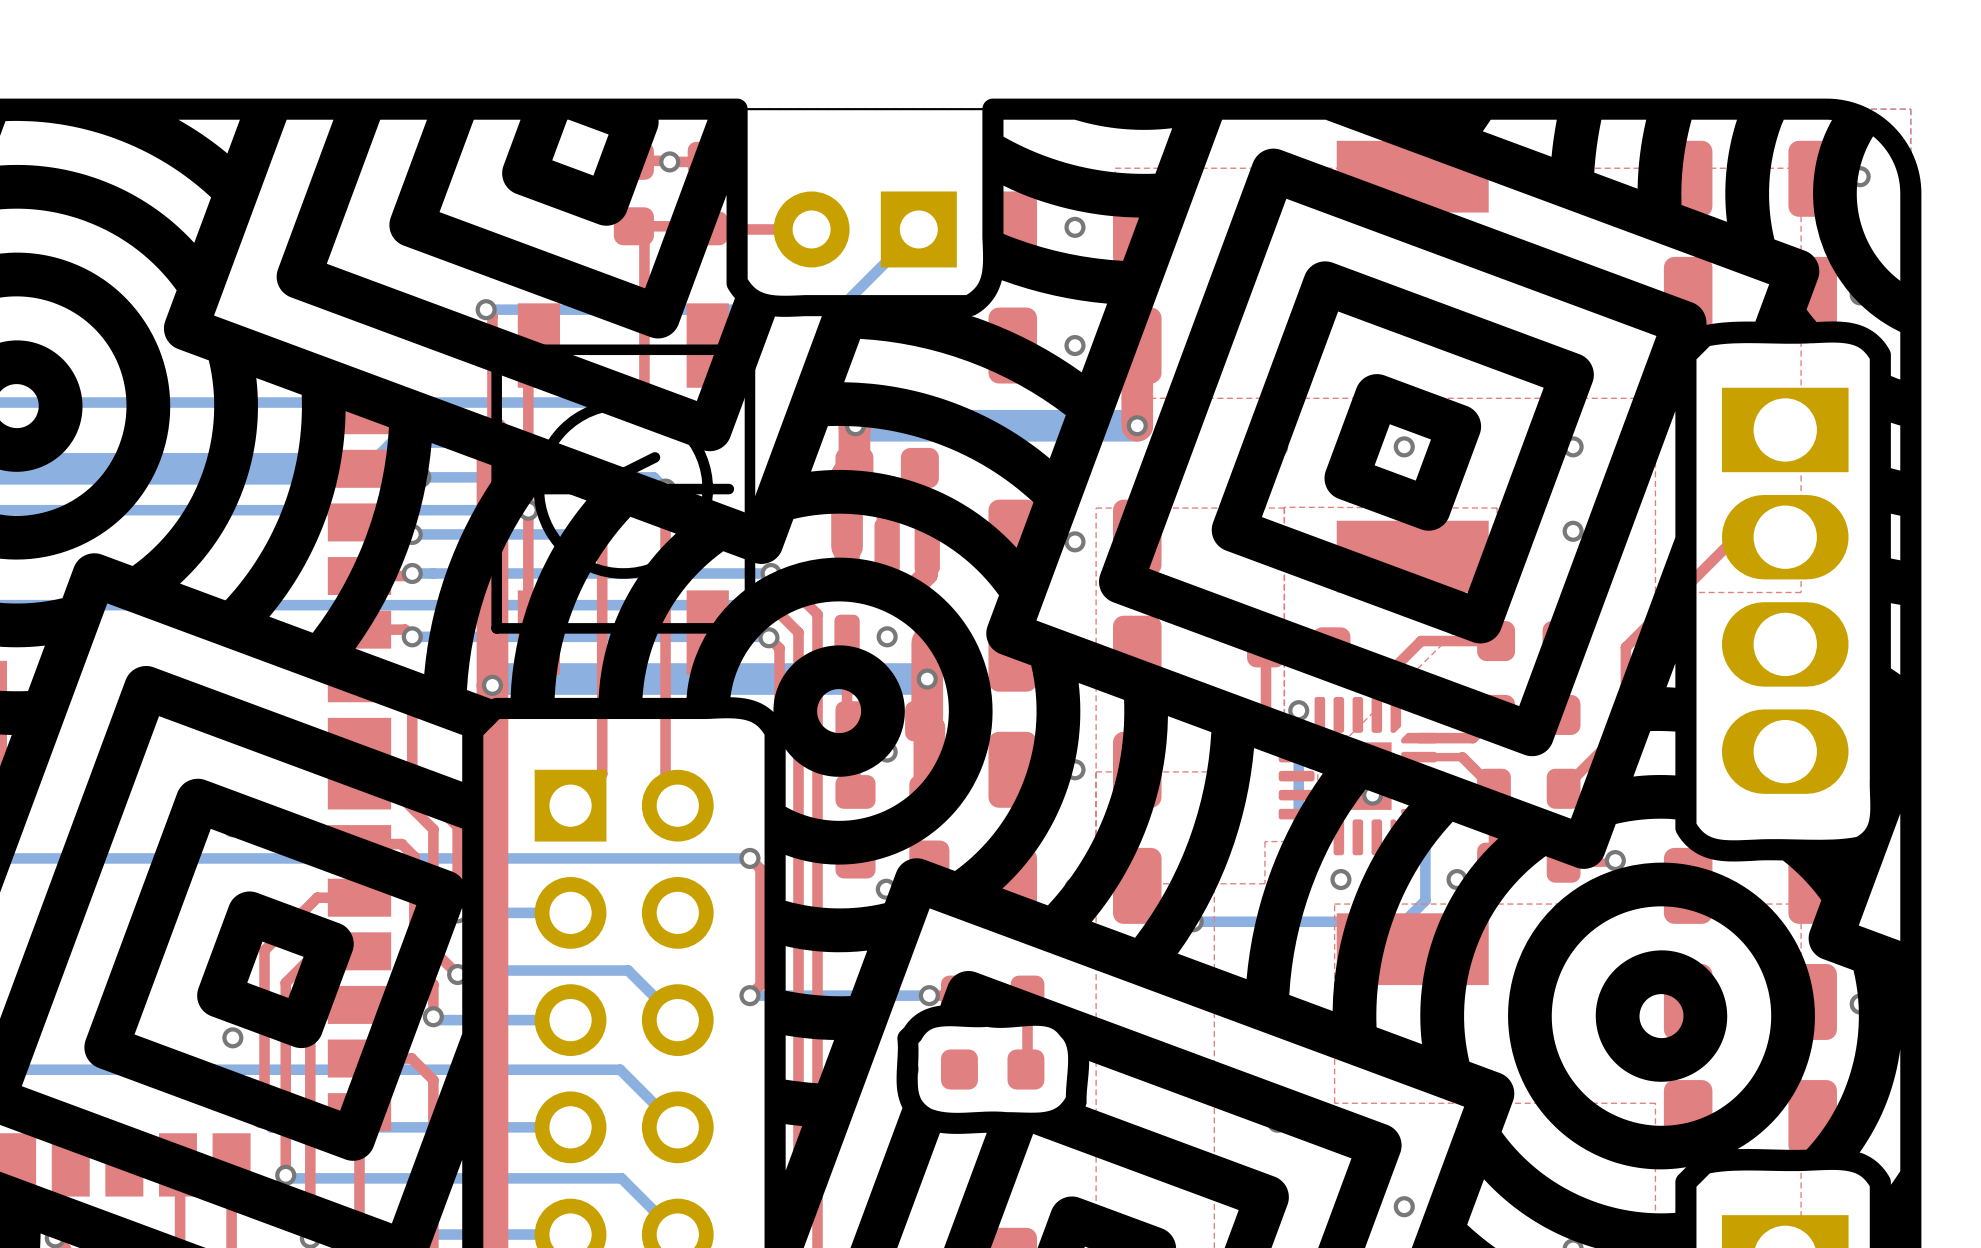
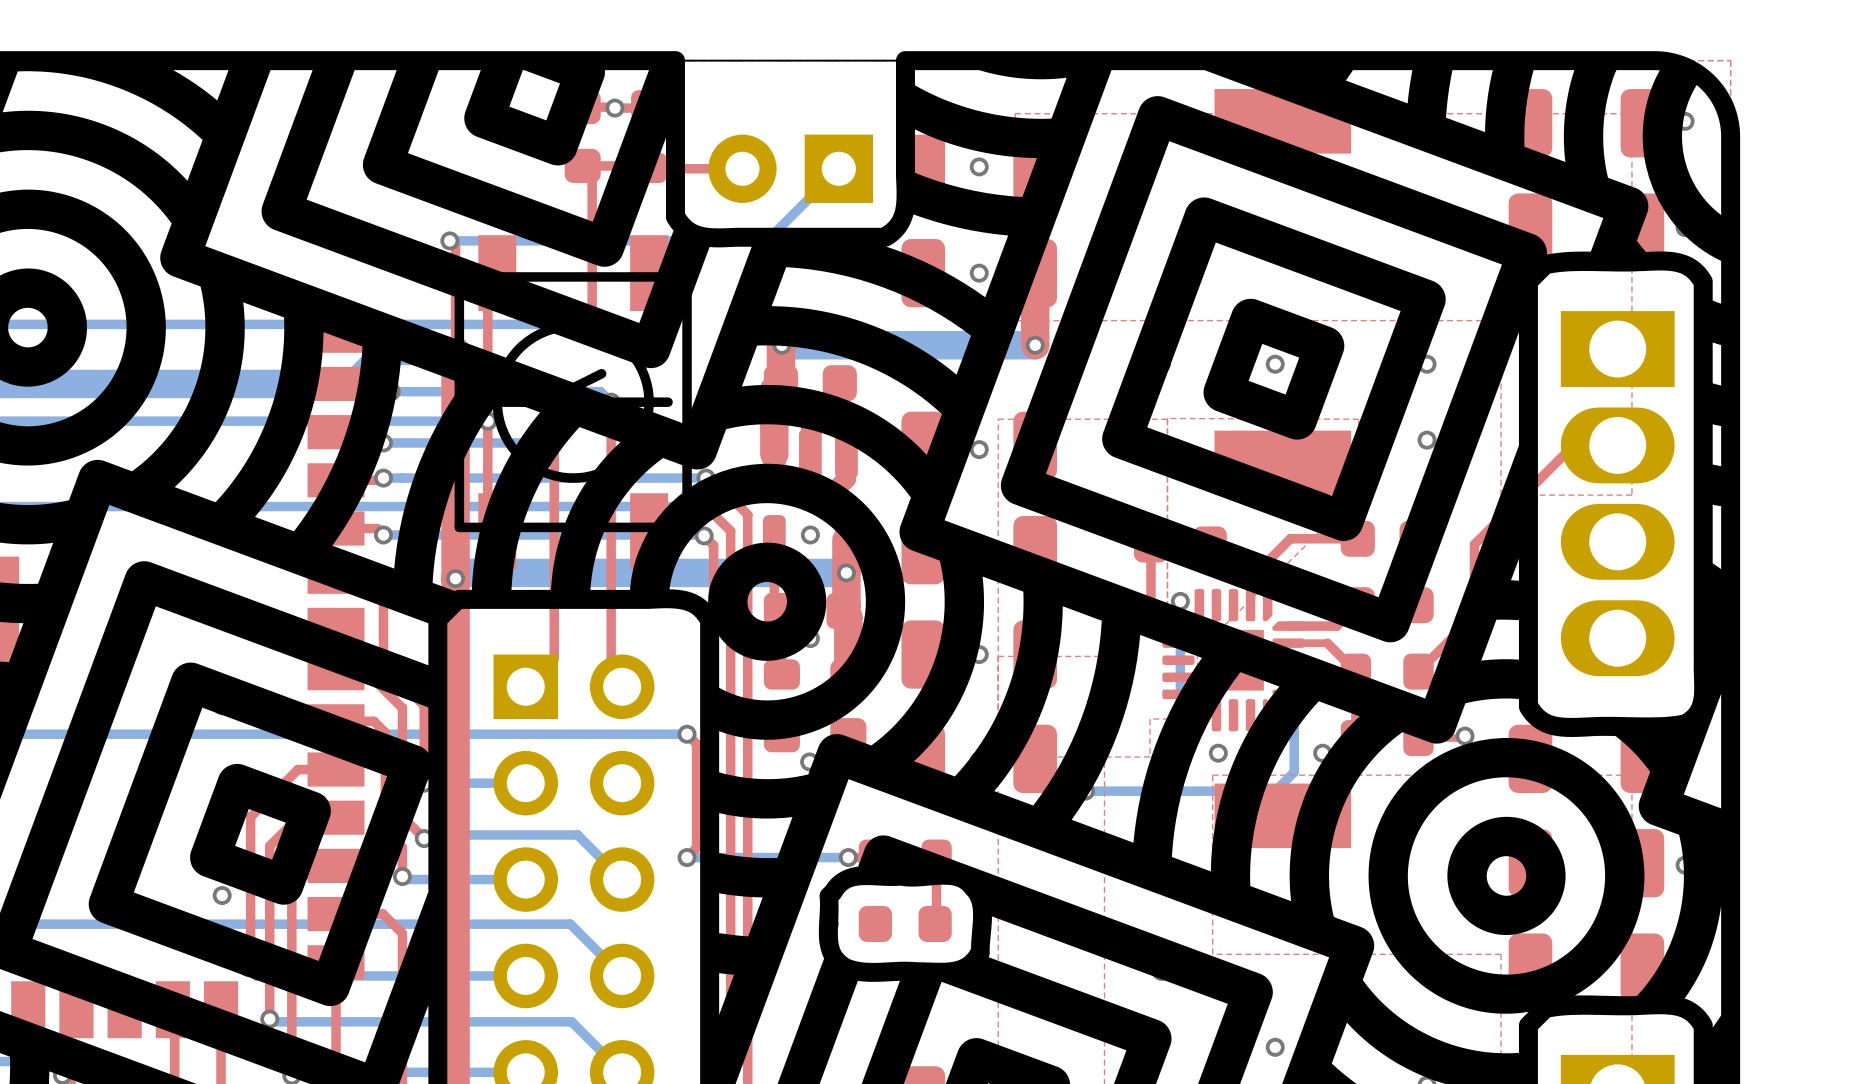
via: (1372, 795) -> none

